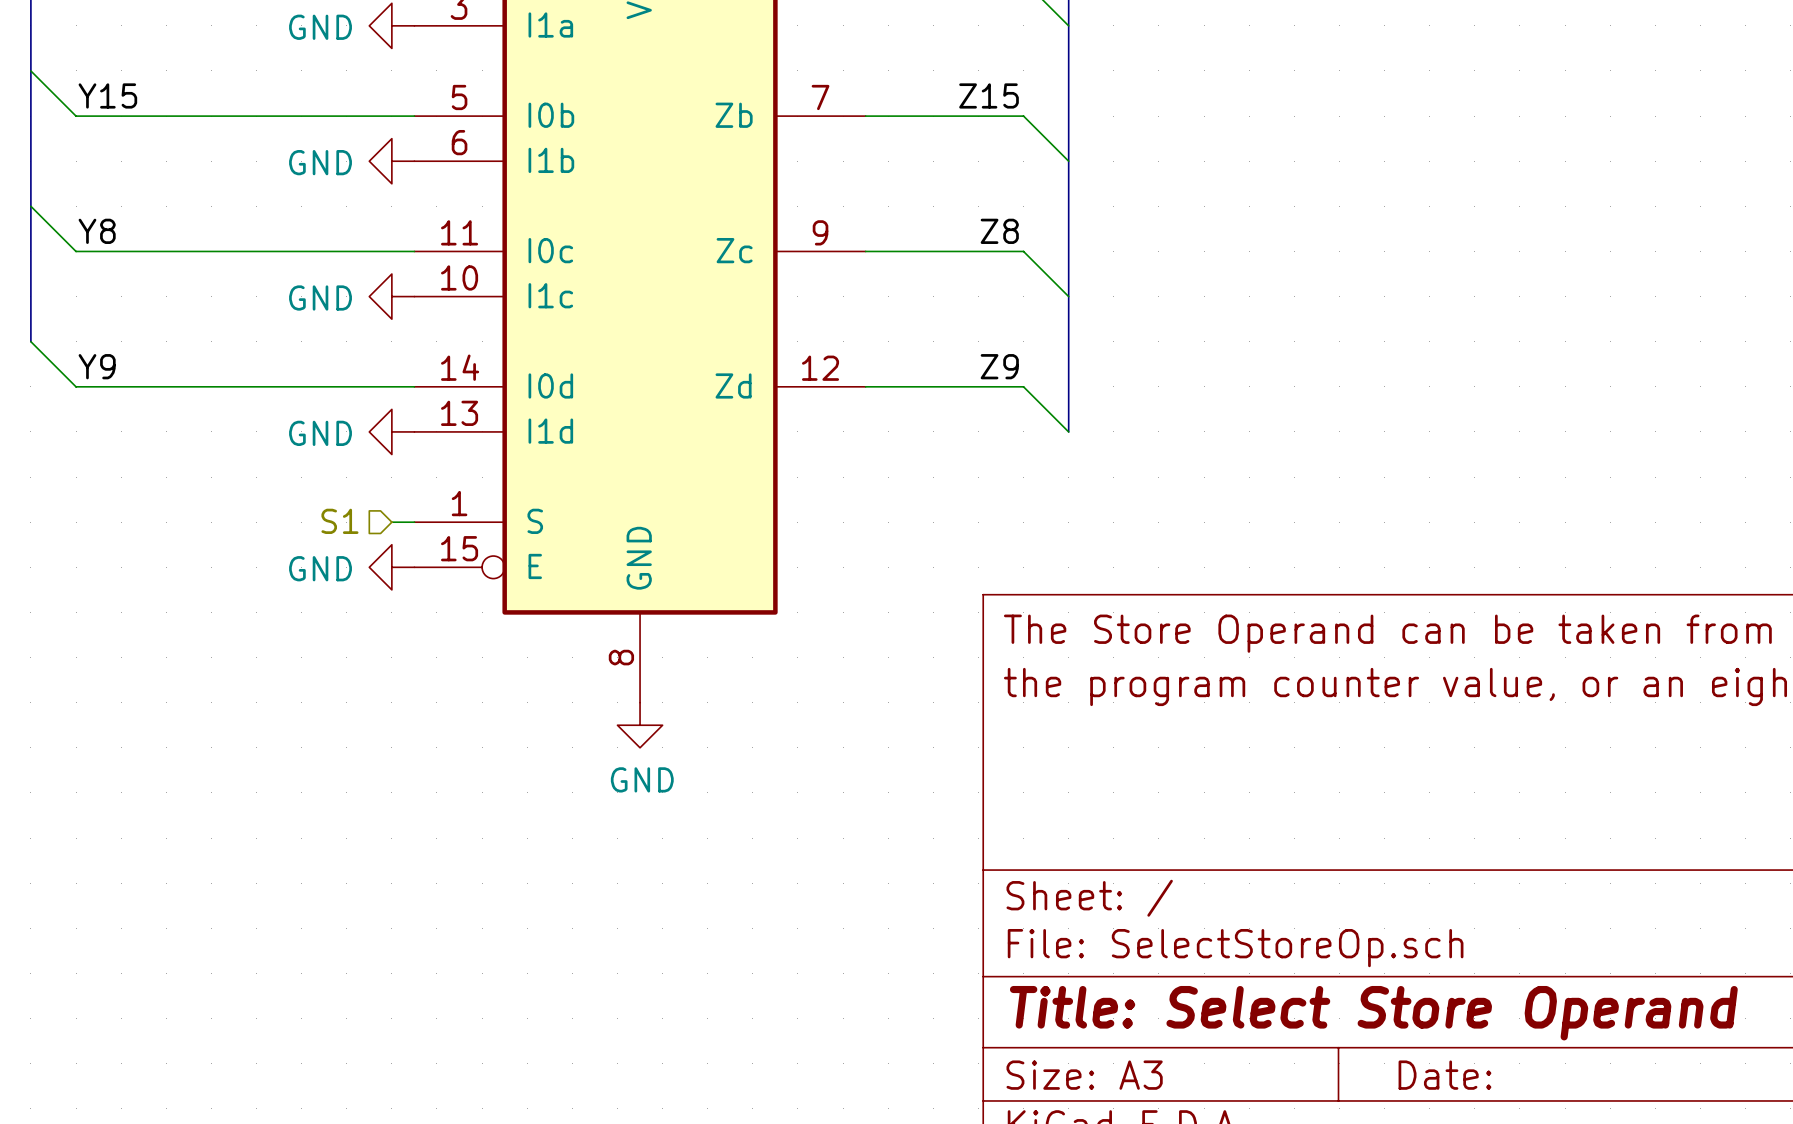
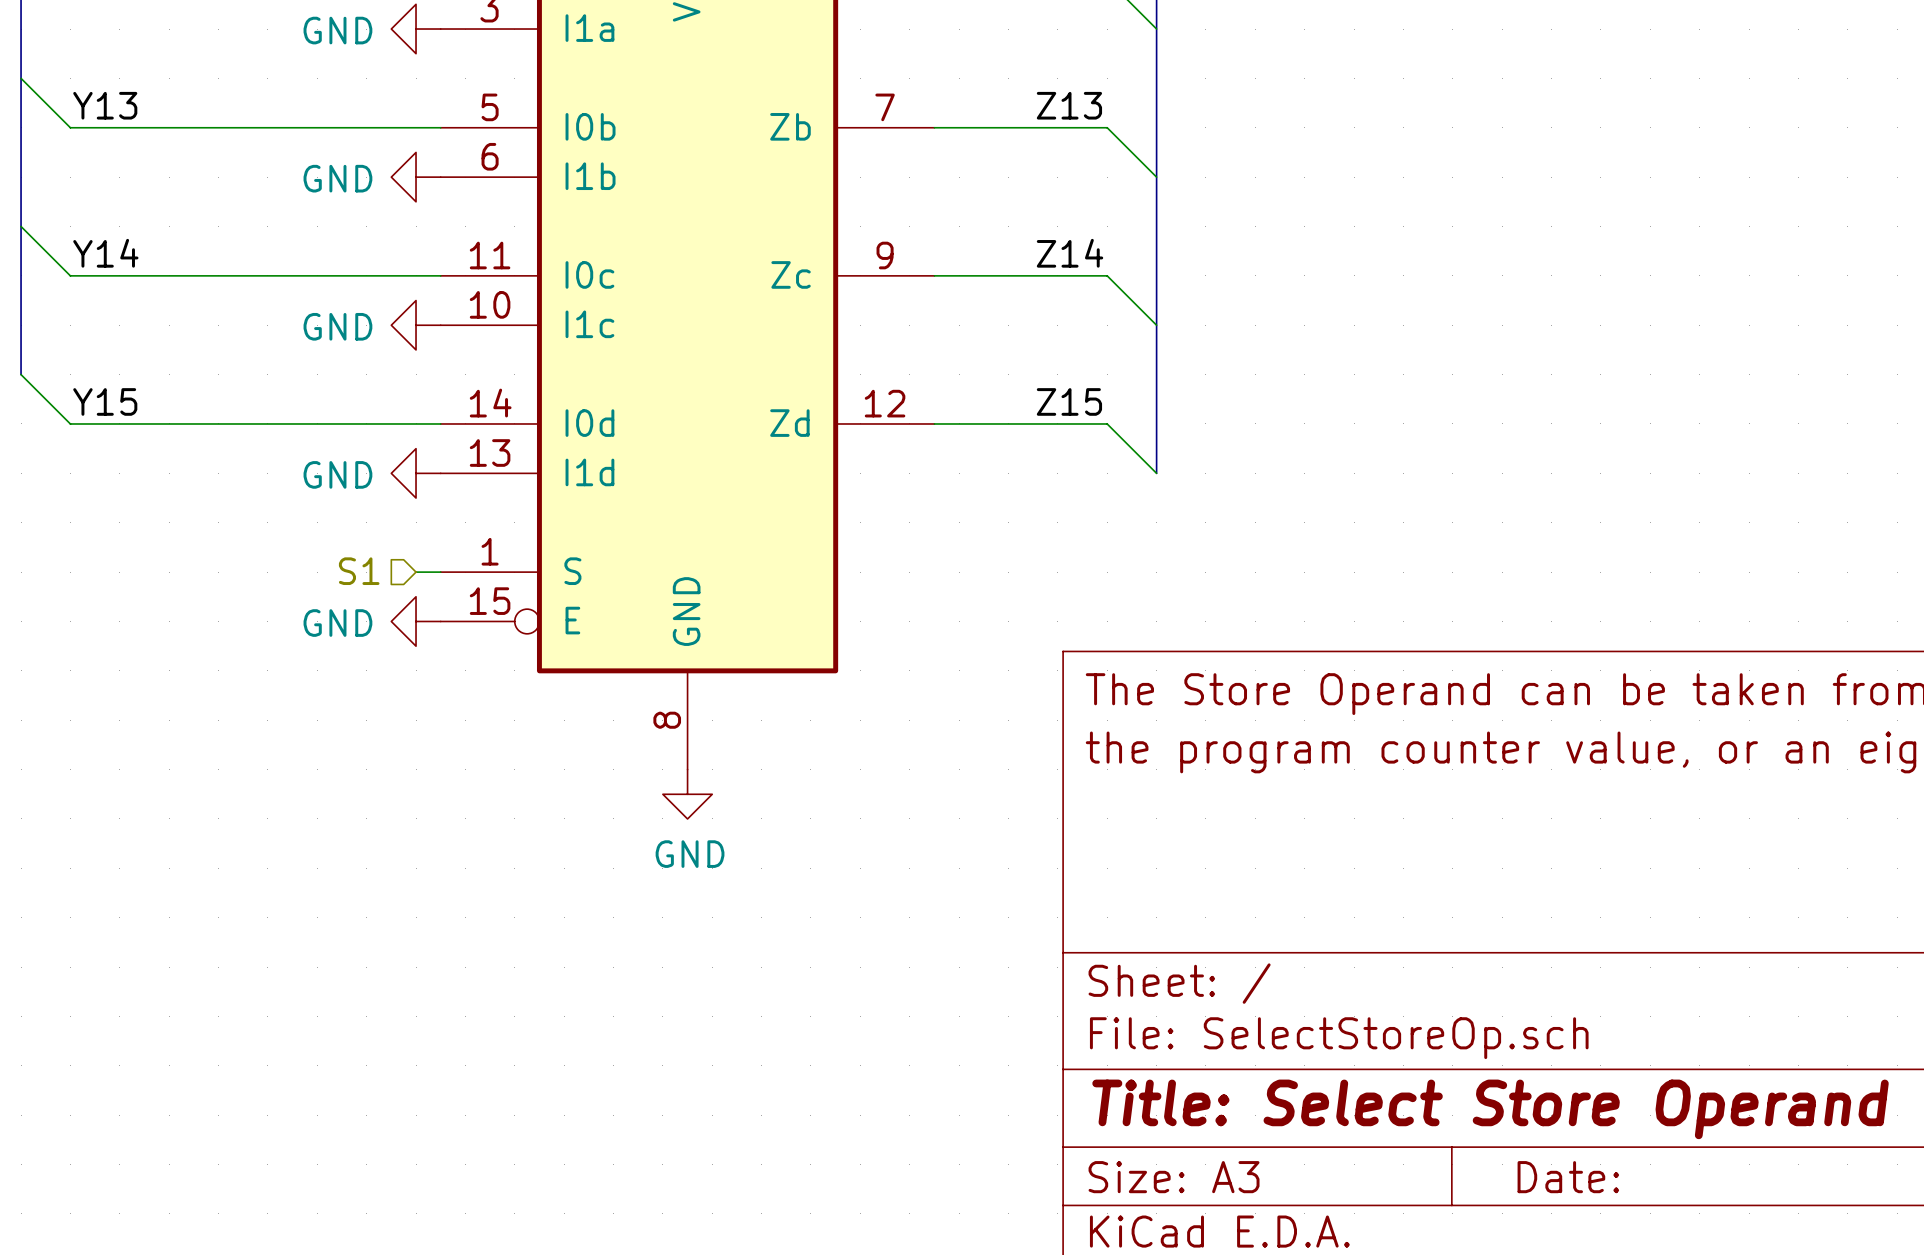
label: Y15 (107, 95) -> Y13 (105, 105)
label: Z15 (989, 95) -> Z13 (1069, 105)
label: Y8 (97, 231) -> Y14 (105, 253)
label: Z8 (999, 231) -> Z14 (1070, 253)
label: Y9 (97, 366) -> Y15 (105, 401)
label: Z9 (999, 366) -> Z15 (1069, 401)

